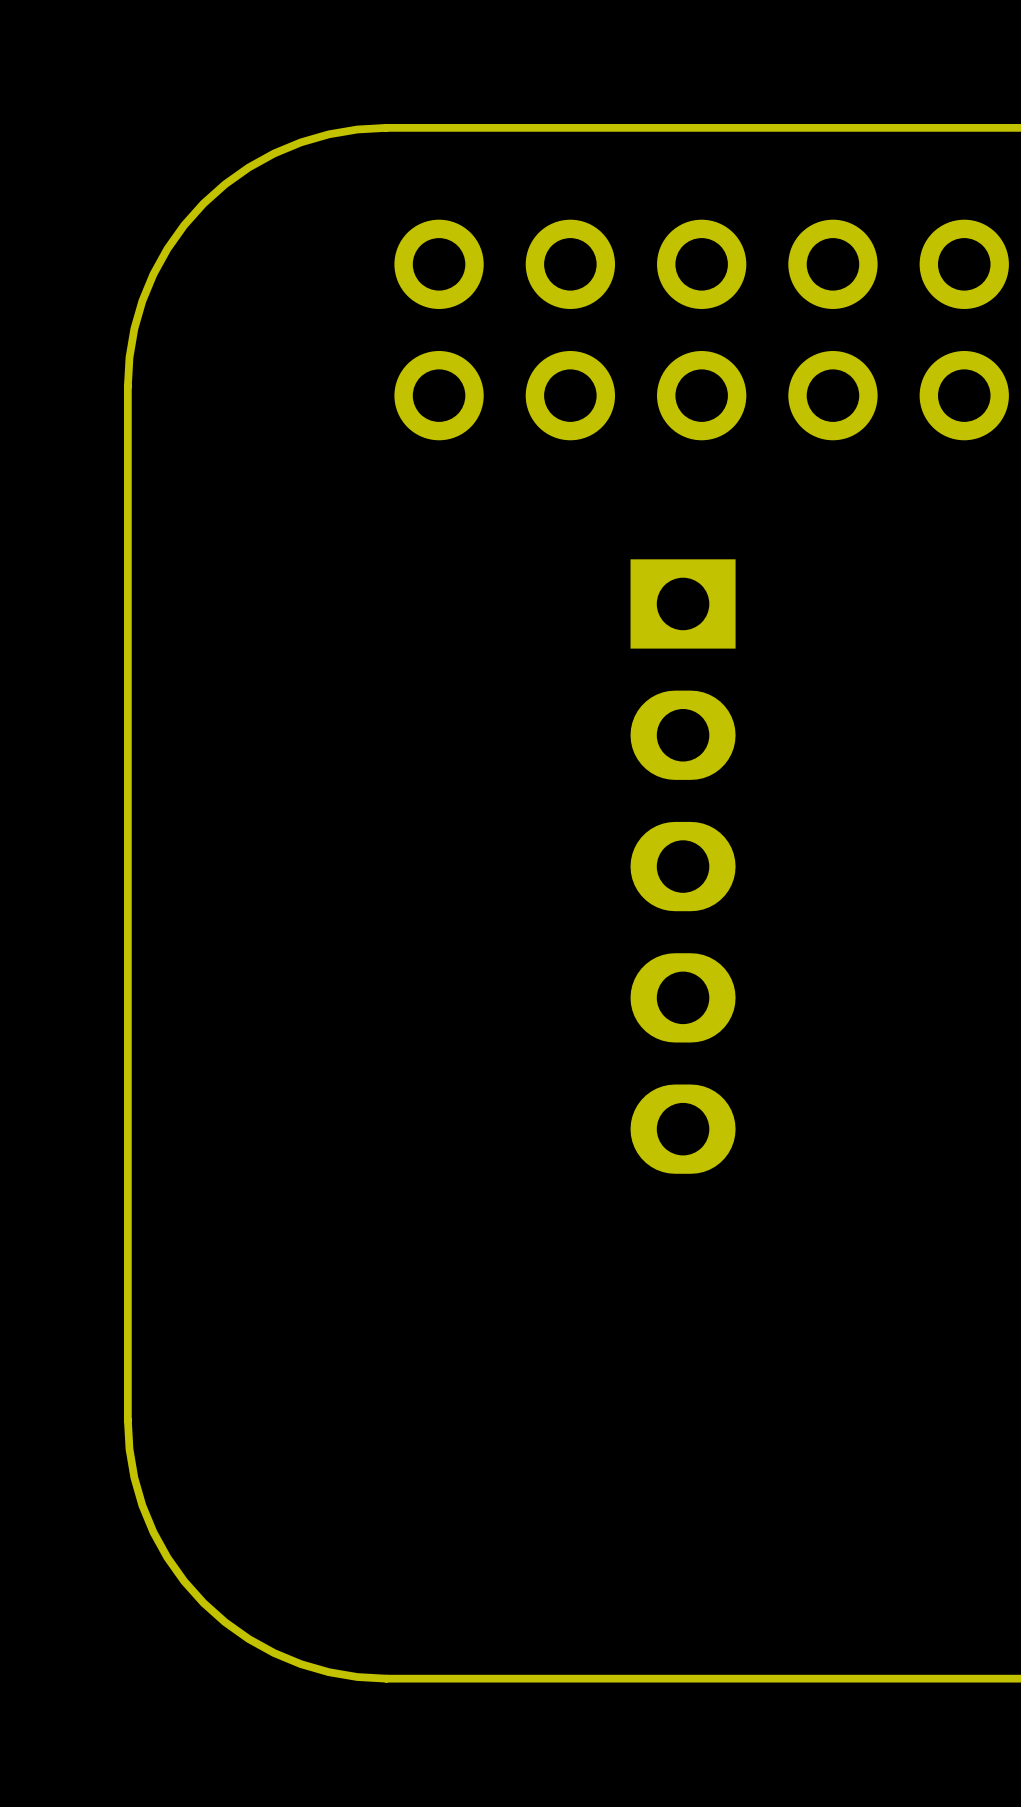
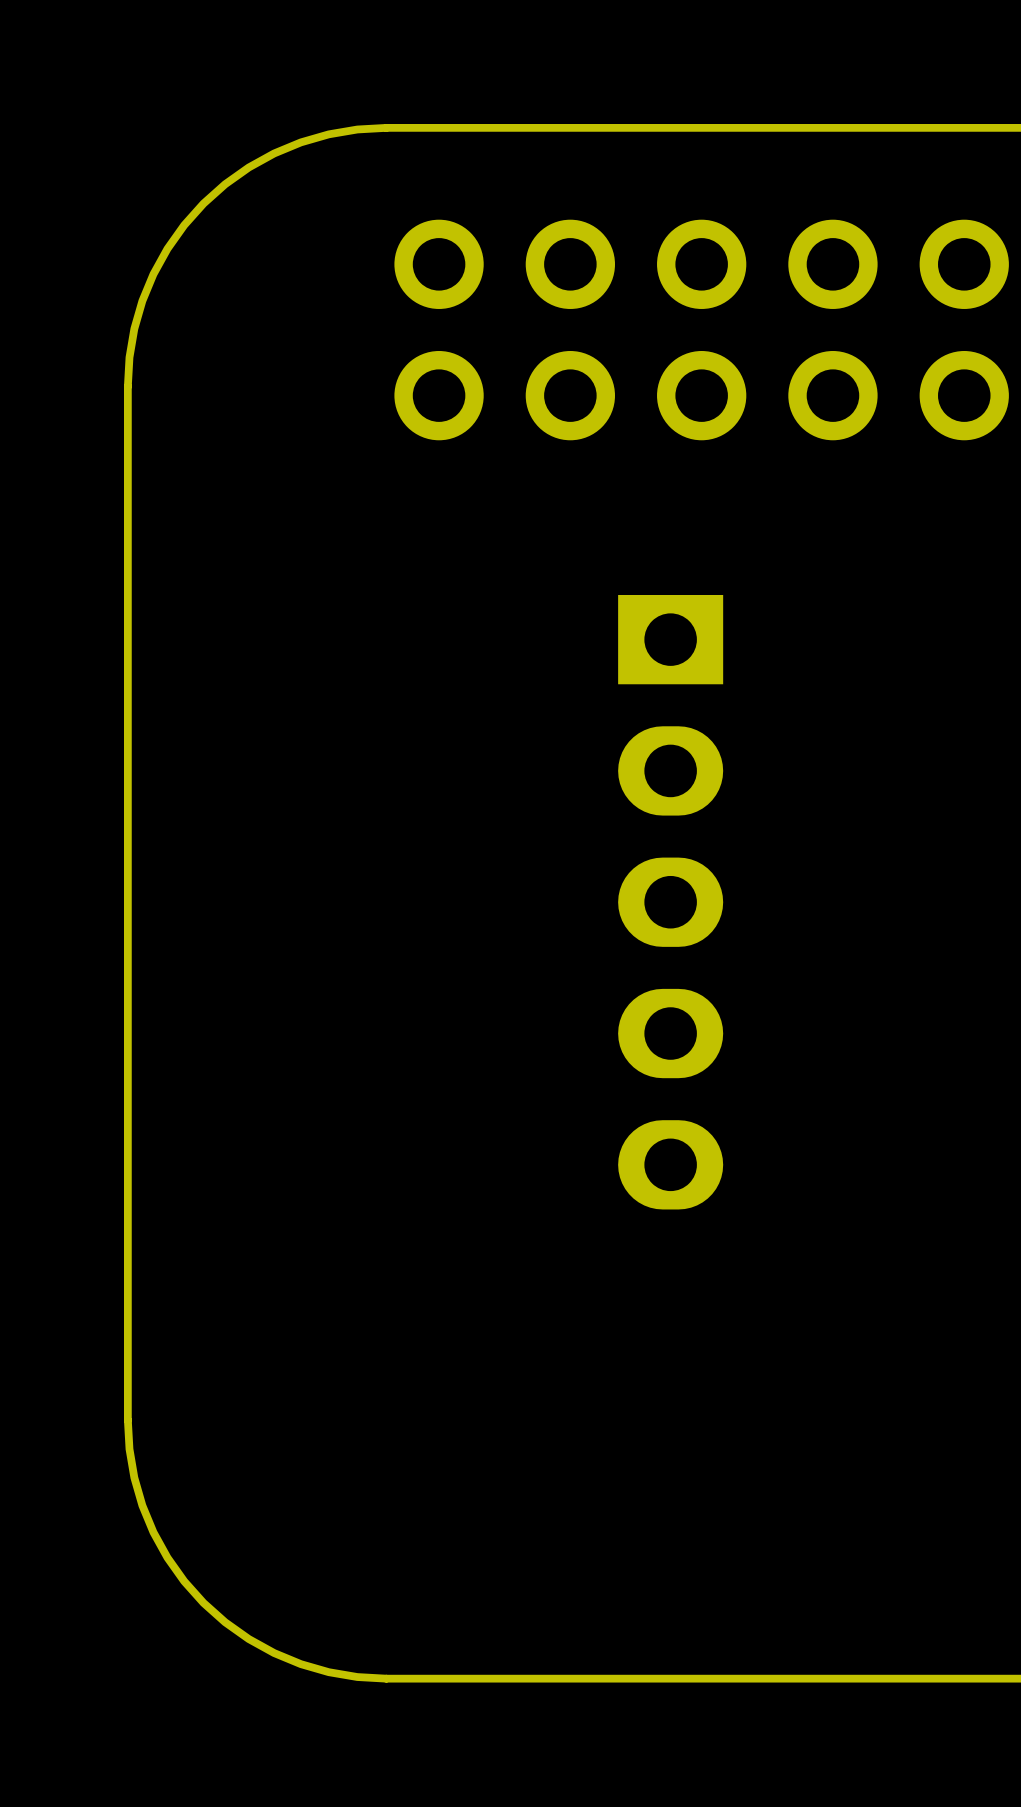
part position: (683, 866) -> (670, 902)

